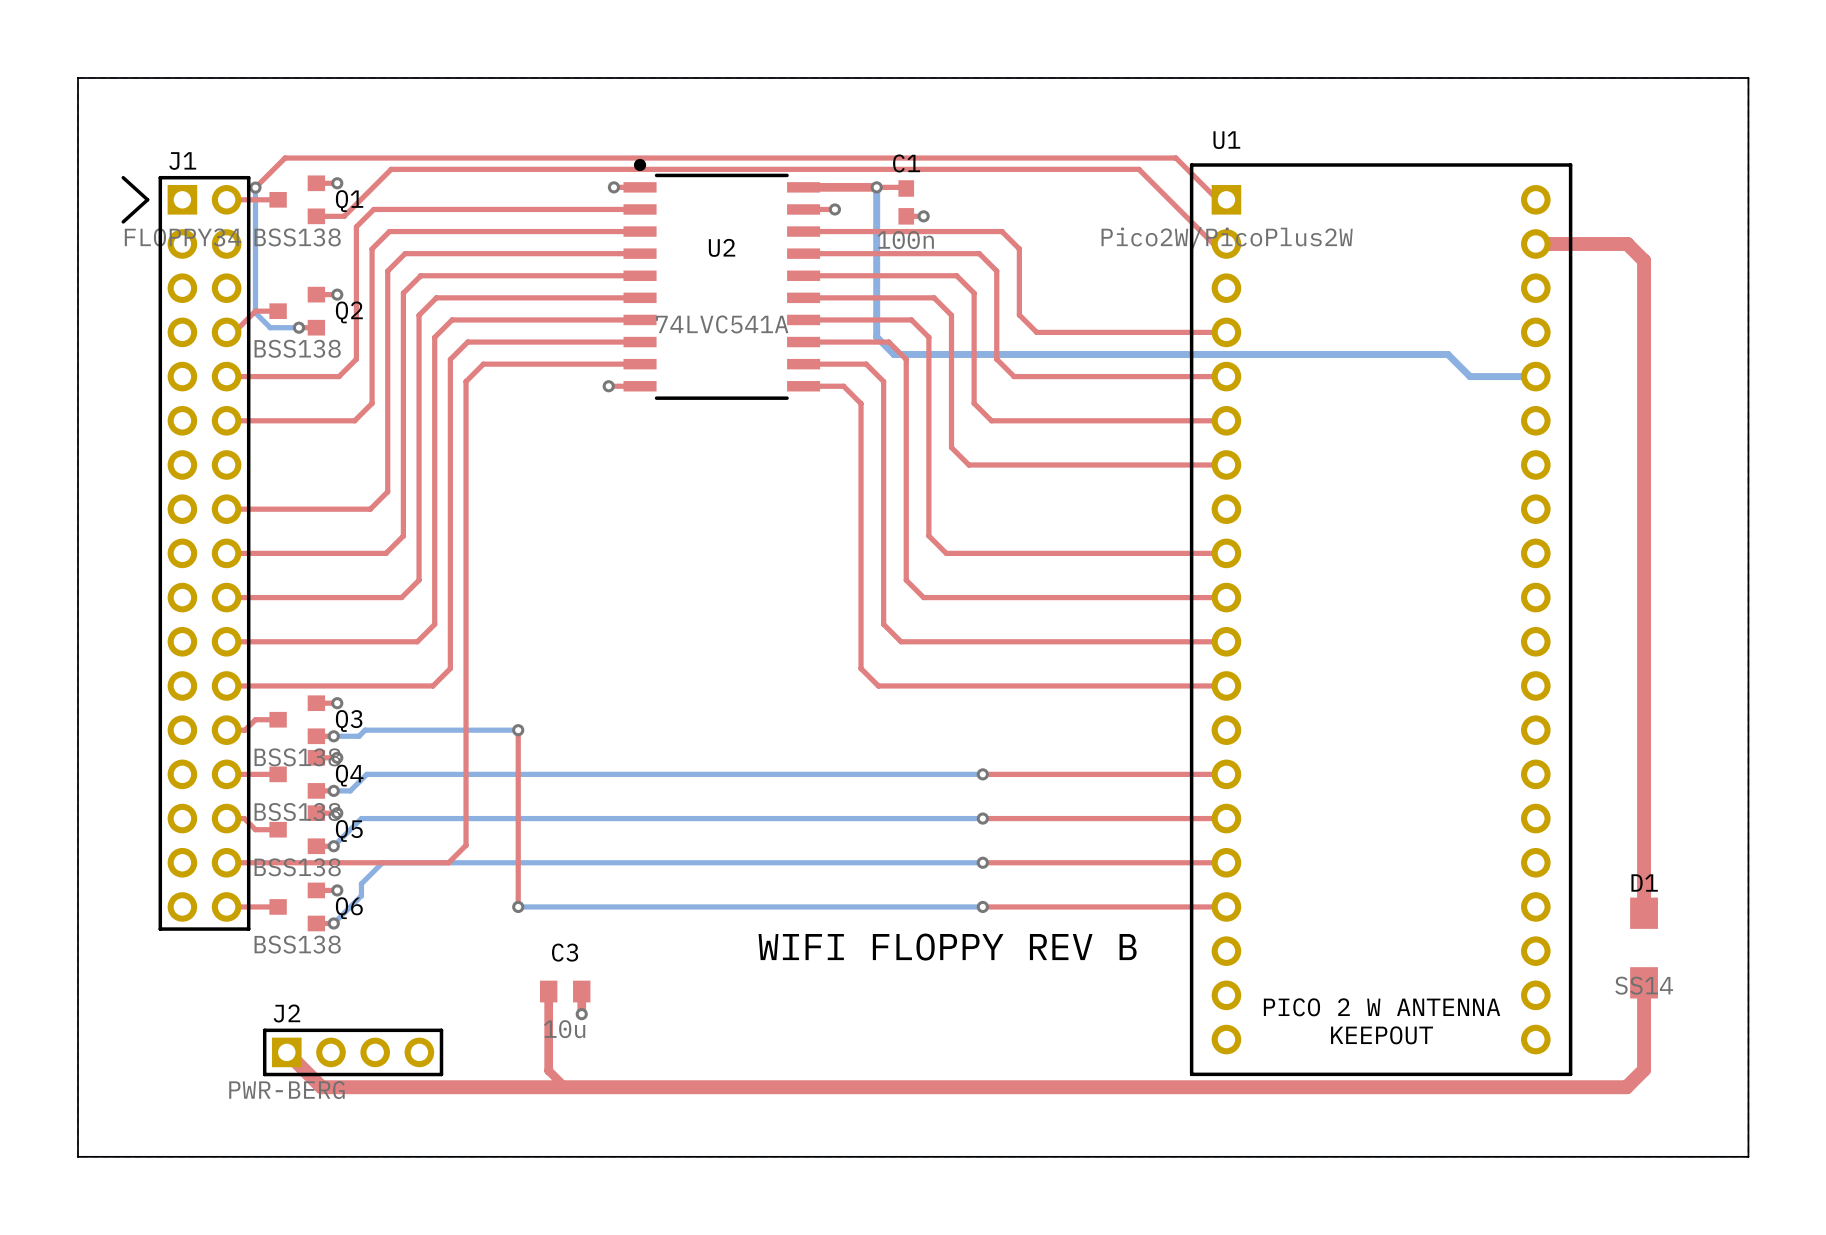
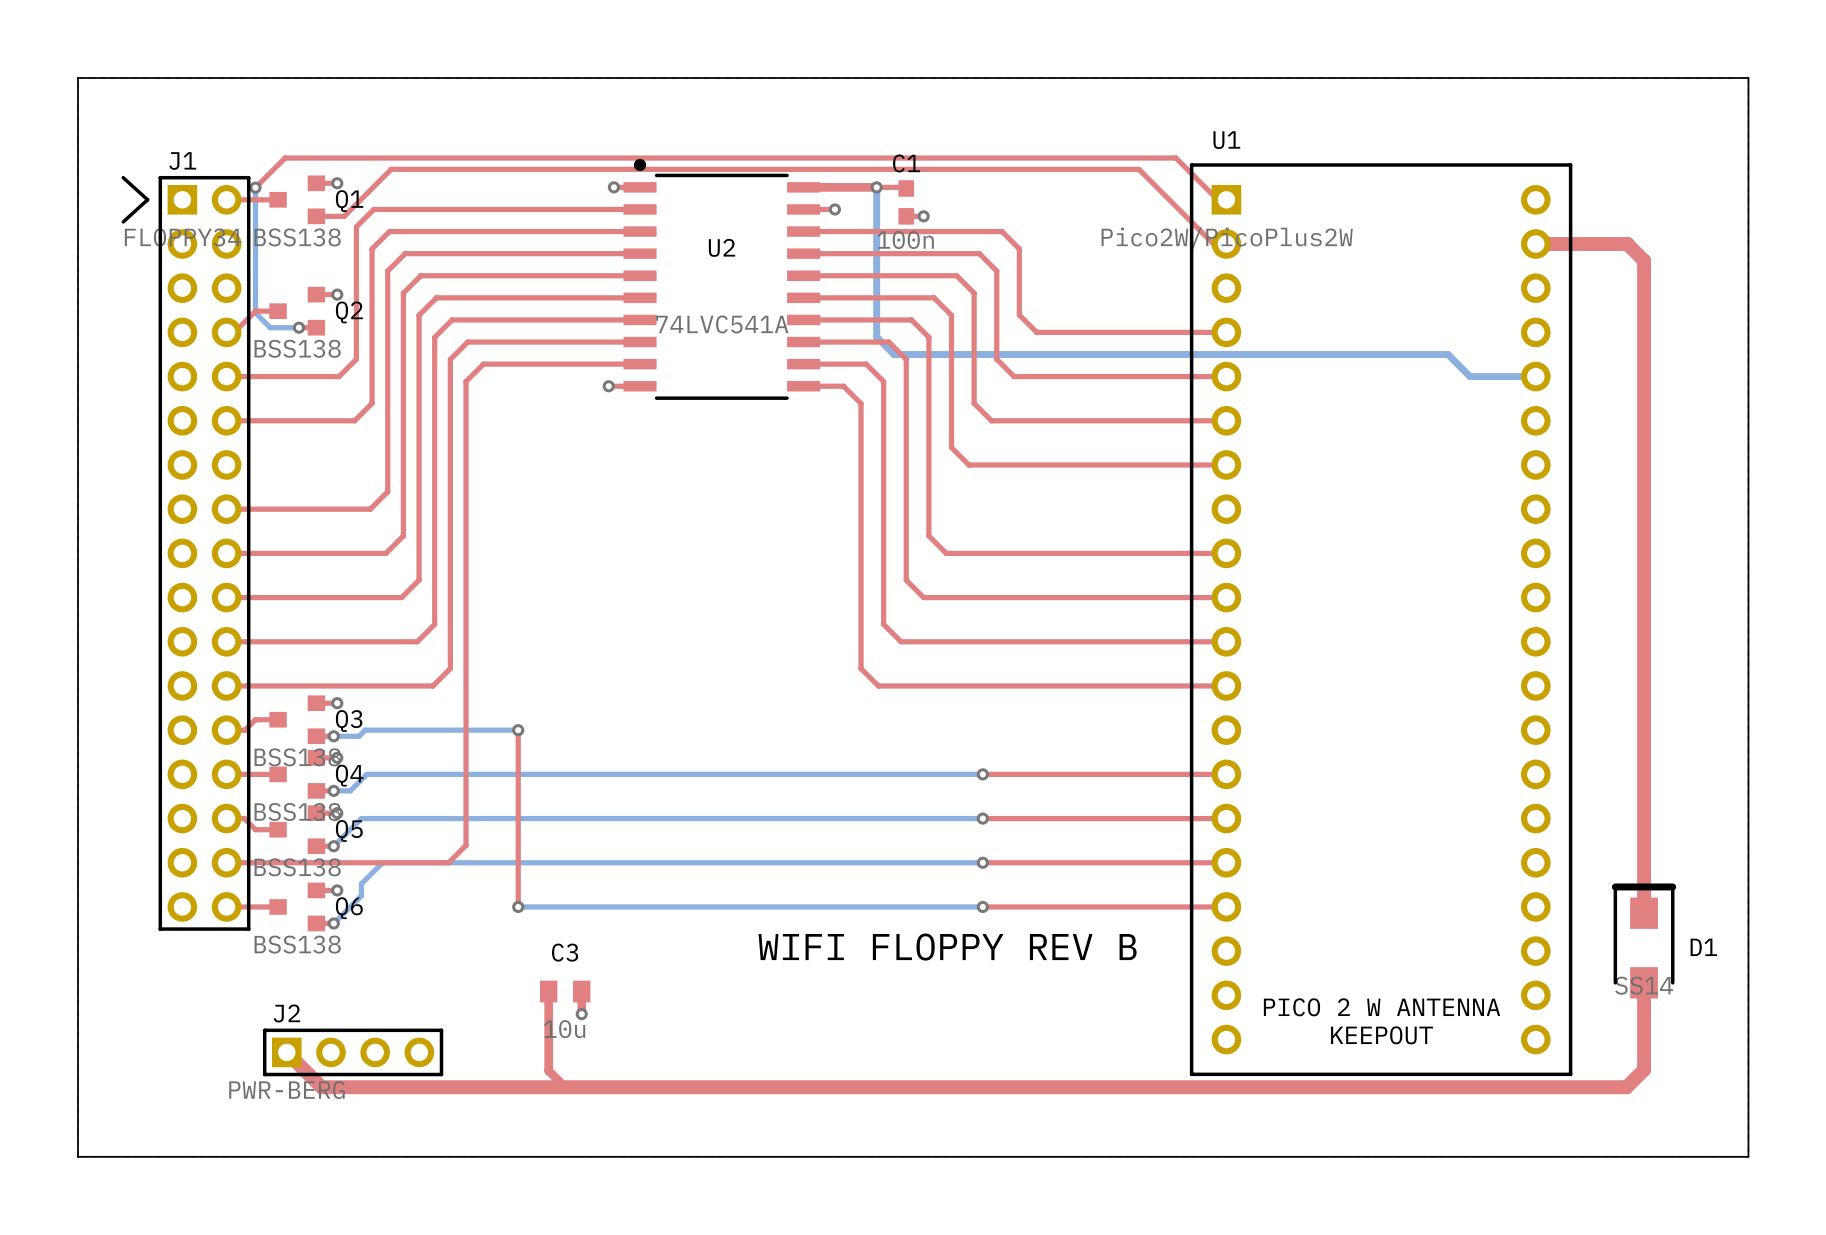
D1 name position: D1 (1644, 882) -> D1 (1703, 947)
D1 footprint: [1630, 897, 1658, 999] -> [1611, 883, 1677, 999]

